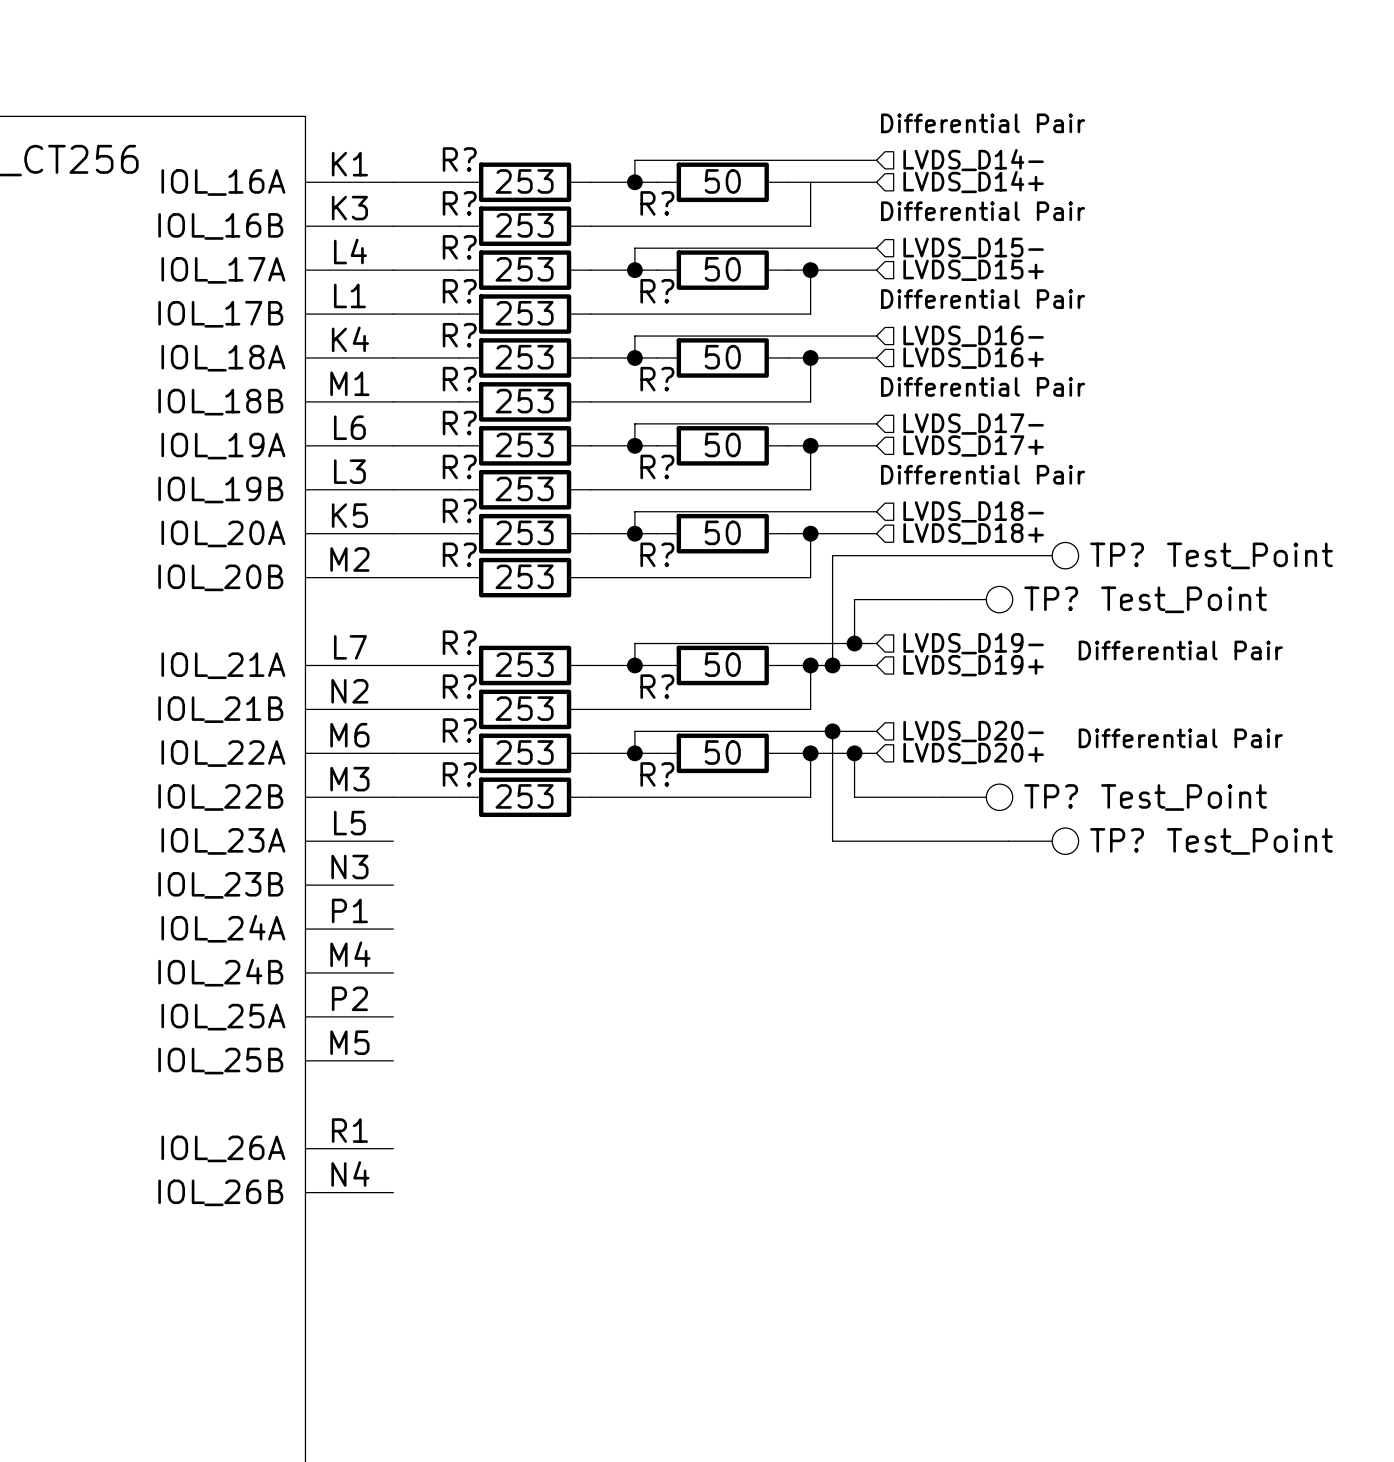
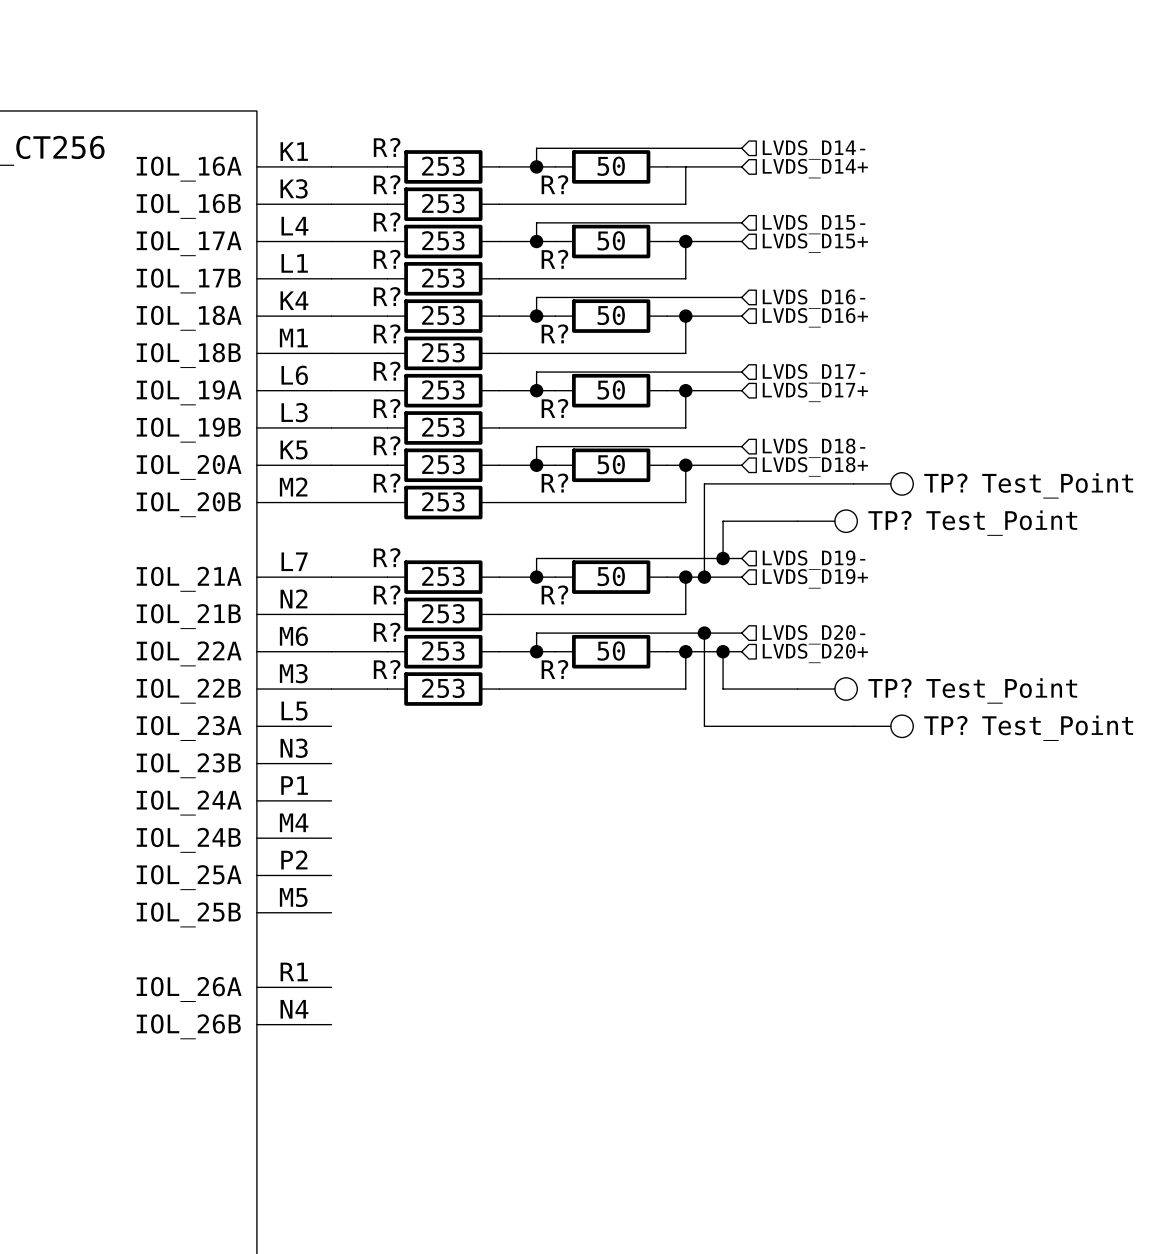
text: Differential Pair (983, 123) -> none
text: Differential Pair (983, 211) -> none
text: Differential Pair (983, 299) -> none
text: Differential Pair (983, 386) -> none
text: Differential Pair (983, 474) -> none
text: Differential Pair (1180, 650) -> none
text: Differential Pair (1180, 738) -> none

